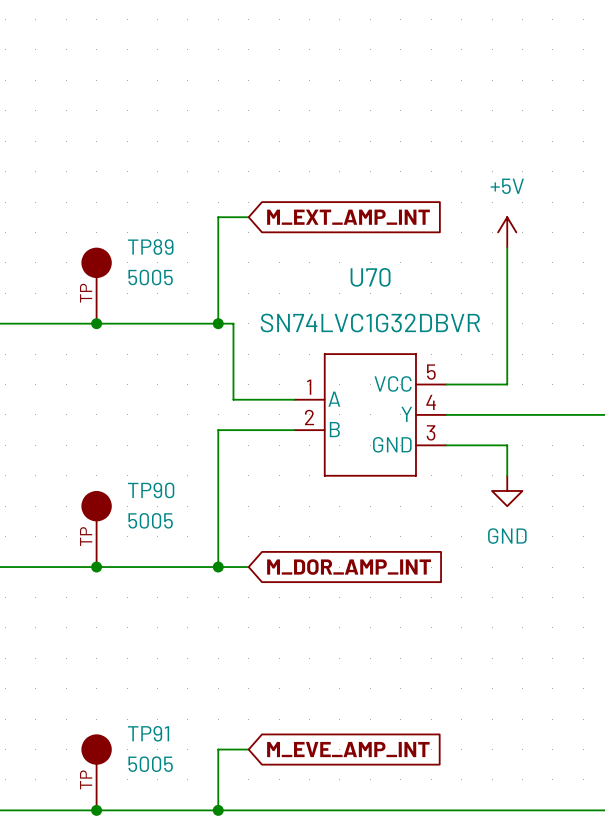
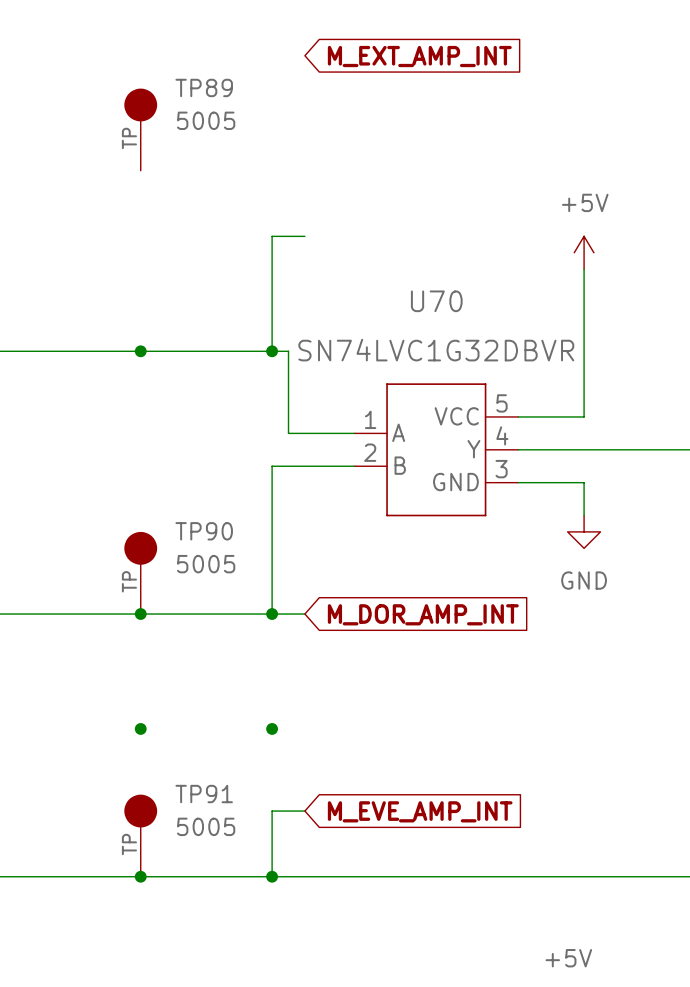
global label position: M_EXT_AMP_INT (348, 217) -> M_EXT_AMP_INT (419, 56)
TP89 position: (96, 285) -> (140, 129)
junction: none -> (140, 728)
junction: none -> (272, 728)

